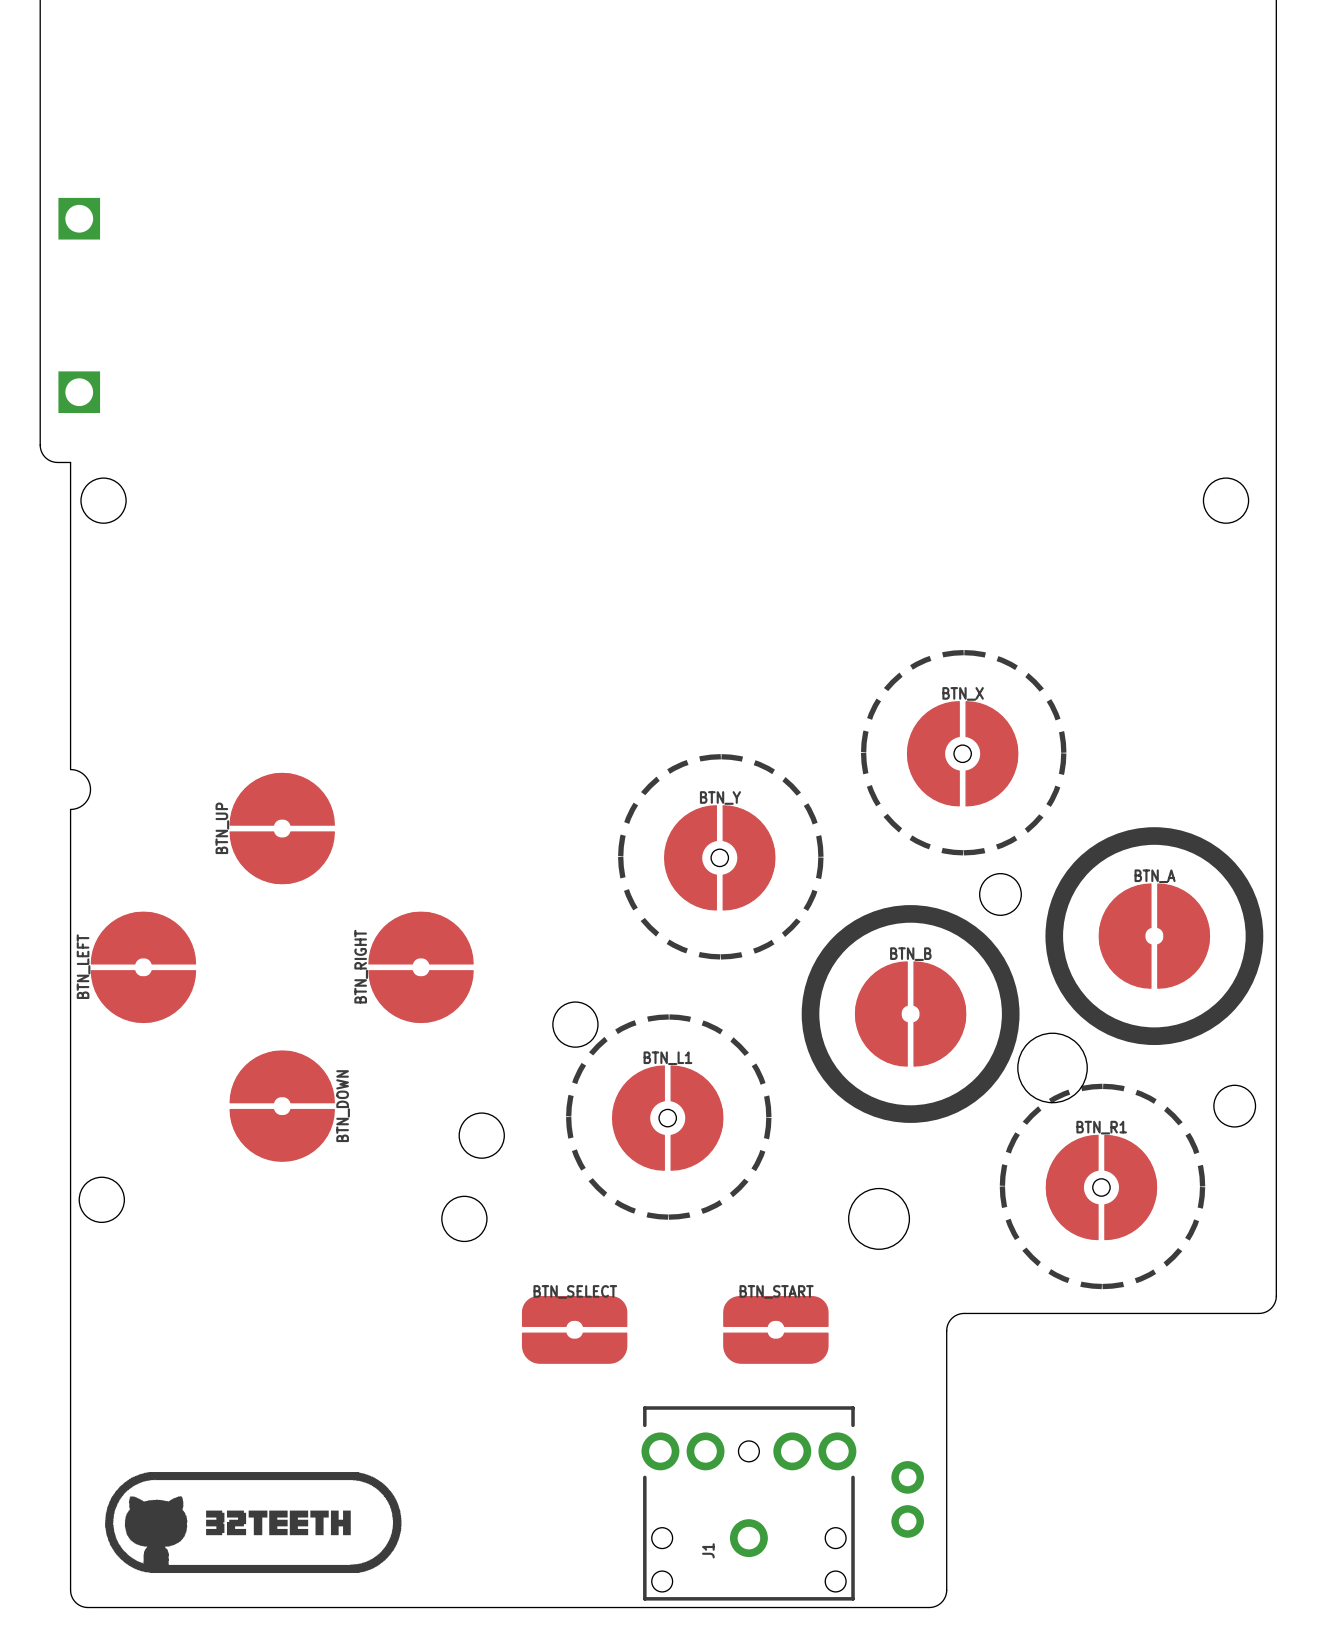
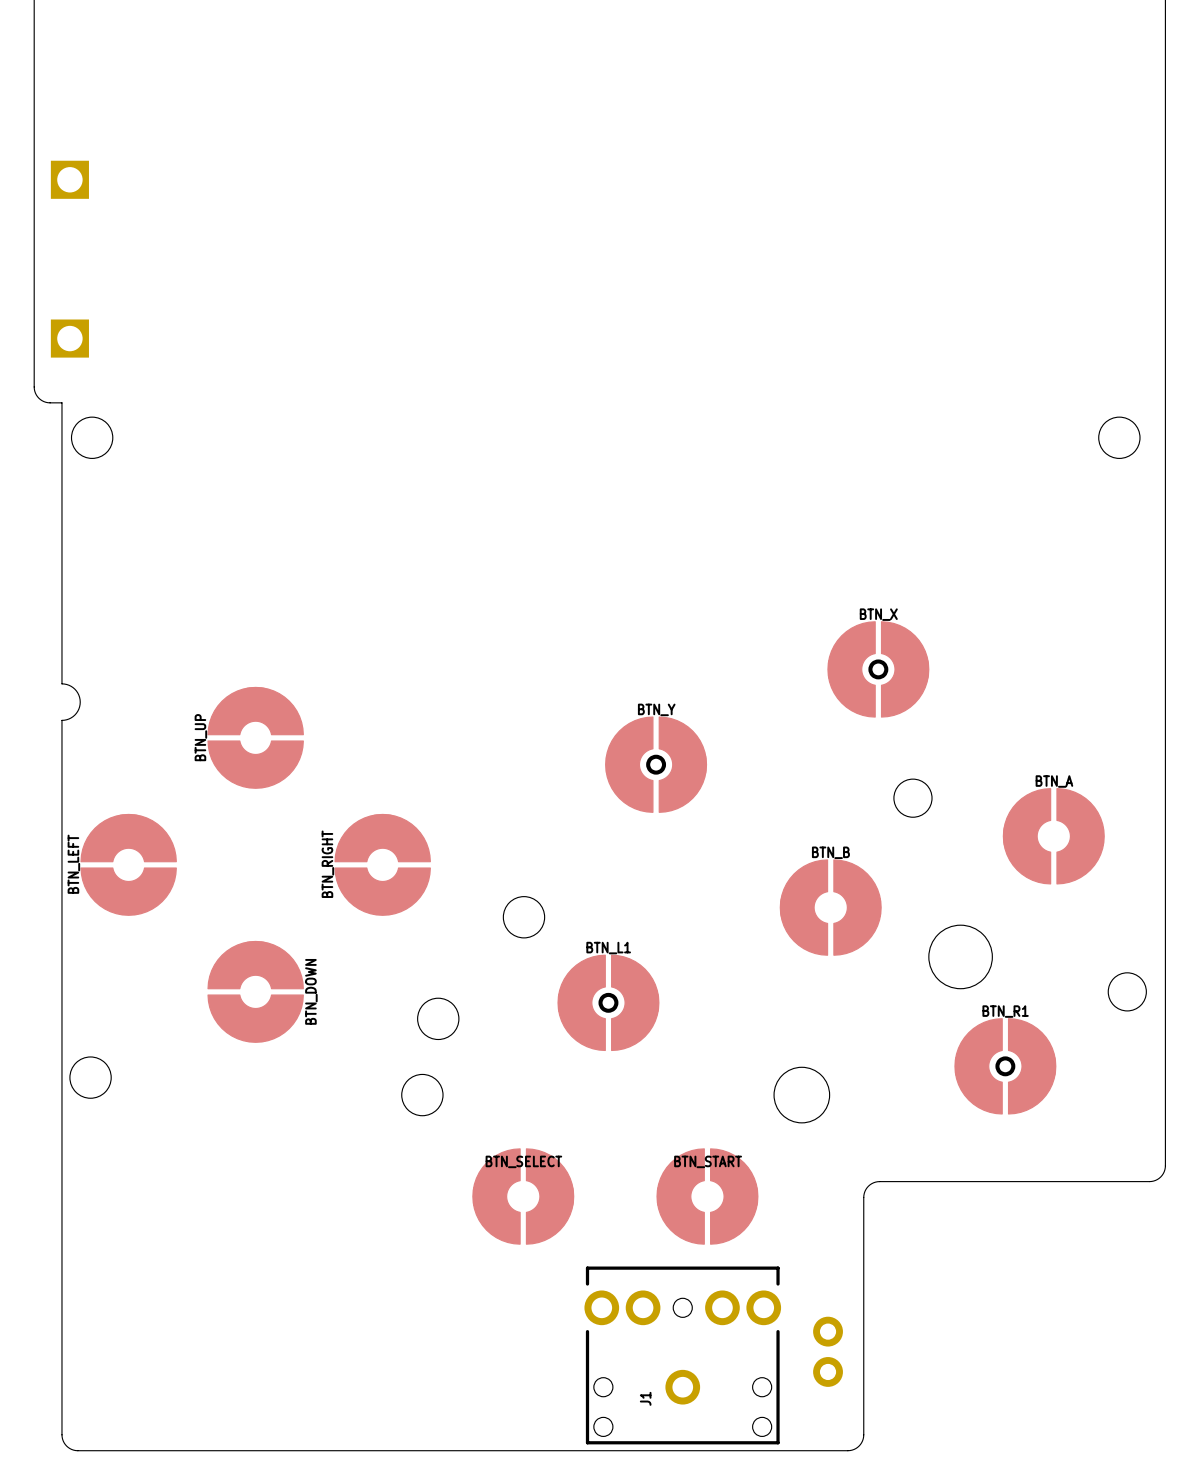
line: (963, 652) (983, 654) (1002, 660) (1019, 669) (1034, 681) (1046, 697) (1056, 714) (1061, 733) (1063, 752) (1061, 772) (1056, 791) (1046, 808) (1034, 823) (1019, 835) (1002, 845) (983, 850) (963, 852) (944, 850) (925, 845) (908, 835) (892, 823) (880, 808) (871, 791) (865, 772) (863, 752) (865, 733) (871, 714) (880, 697) (892, 681) (908, 669) (925, 660) (944, 654) (963, 652) -> none
BTN_X footprint: [906, 701, 1019, 807] -> [827, 621, 930, 718]
line: (720, 756) (740, 758) (759, 764) (776, 773) (791, 786) (804, 801) (813, 818) (818, 837) (820, 856) (818, 876) (813, 895) (804, 912) (791, 927) (776, 940) (759, 949) (740, 955) (720, 956) (701, 955) (682, 949) (665, 940) (650, 927) (637, 912) (628, 895) (622, 876) (620, 856) (622, 837) (628, 818) (637, 801) (650, 786) (665, 773) (682, 764) (701, 758) (720, 756) -> none
BTN_UP footprint: [229, 772, 335, 885] -> [207, 686, 304, 789]
BTN_Y footprint: [664, 805, 776, 911] -> [605, 716, 708, 813]
drawing: [1045, 827, 1264, 1046] -> none
BTN_A footprint: [1098, 883, 1211, 989] -> [1002, 788, 1105, 885]
drawing: [801, 905, 1020, 1123] -> none
BTN_LEFT footprint: [90, 911, 197, 1024] -> [80, 813, 177, 916]
BTN_RIGHT footprint: [368, 911, 474, 1024] -> [334, 813, 431, 916]
BTN_B footprint: [854, 961, 967, 1067] -> [779, 859, 882, 956]
line: (668, 1016) (688, 1018) (707, 1024) (724, 1033) (739, 1046) (752, 1061) (761, 1078) (766, 1097) (768, 1117) (766, 1136) (761, 1155) (752, 1172) (739, 1187) (724, 1200) (707, 1209) (688, 1215) (668, 1217) (649, 1215) (630, 1209) (613, 1200) (597, 1187) (585, 1172) (576, 1155) (570, 1136) (568, 1117) (570, 1097) (576, 1078) (585, 1061) (597, 1046) (613, 1033) (630, 1024) (649, 1018) (668, 1016) -> none
BTN_DOWN footprint: [229, 1050, 335, 1162] -> [207, 940, 304, 1043]
BTN_L1 footprint: [611, 1065, 724, 1171] -> [557, 954, 660, 1052]
line: (1102, 1086) (1122, 1088) (1140, 1093) (1158, 1103) (1173, 1115) (1185, 1130) (1194, 1148) (1200, 1166) (1202, 1186) (1200, 1205) (1194, 1224) (1185, 1242) (1173, 1257) (1158, 1269) (1140, 1278) (1122, 1284) (1102, 1286) (1082, 1284) (1064, 1278) (1046, 1269) (1031, 1257) (1019, 1242) (1010, 1224) (1004, 1205) (1002, 1186) (1004, 1166) (1010, 1148) (1019, 1130) (1031, 1115) (1046, 1103) (1064, 1093) (1082, 1088) (1102, 1086) -> none
BTN_R1 footprint: [1045, 1134, 1158, 1241] -> [954, 1018, 1057, 1115]
BTN_SELECT footprint: [521, 1296, 628, 1364] -> [472, 1148, 575, 1245]
BTN_START footprint: [723, 1296, 829, 1364] -> [656, 1148, 759, 1245]
drawing: [105, 1472, 402, 1574] -> none

